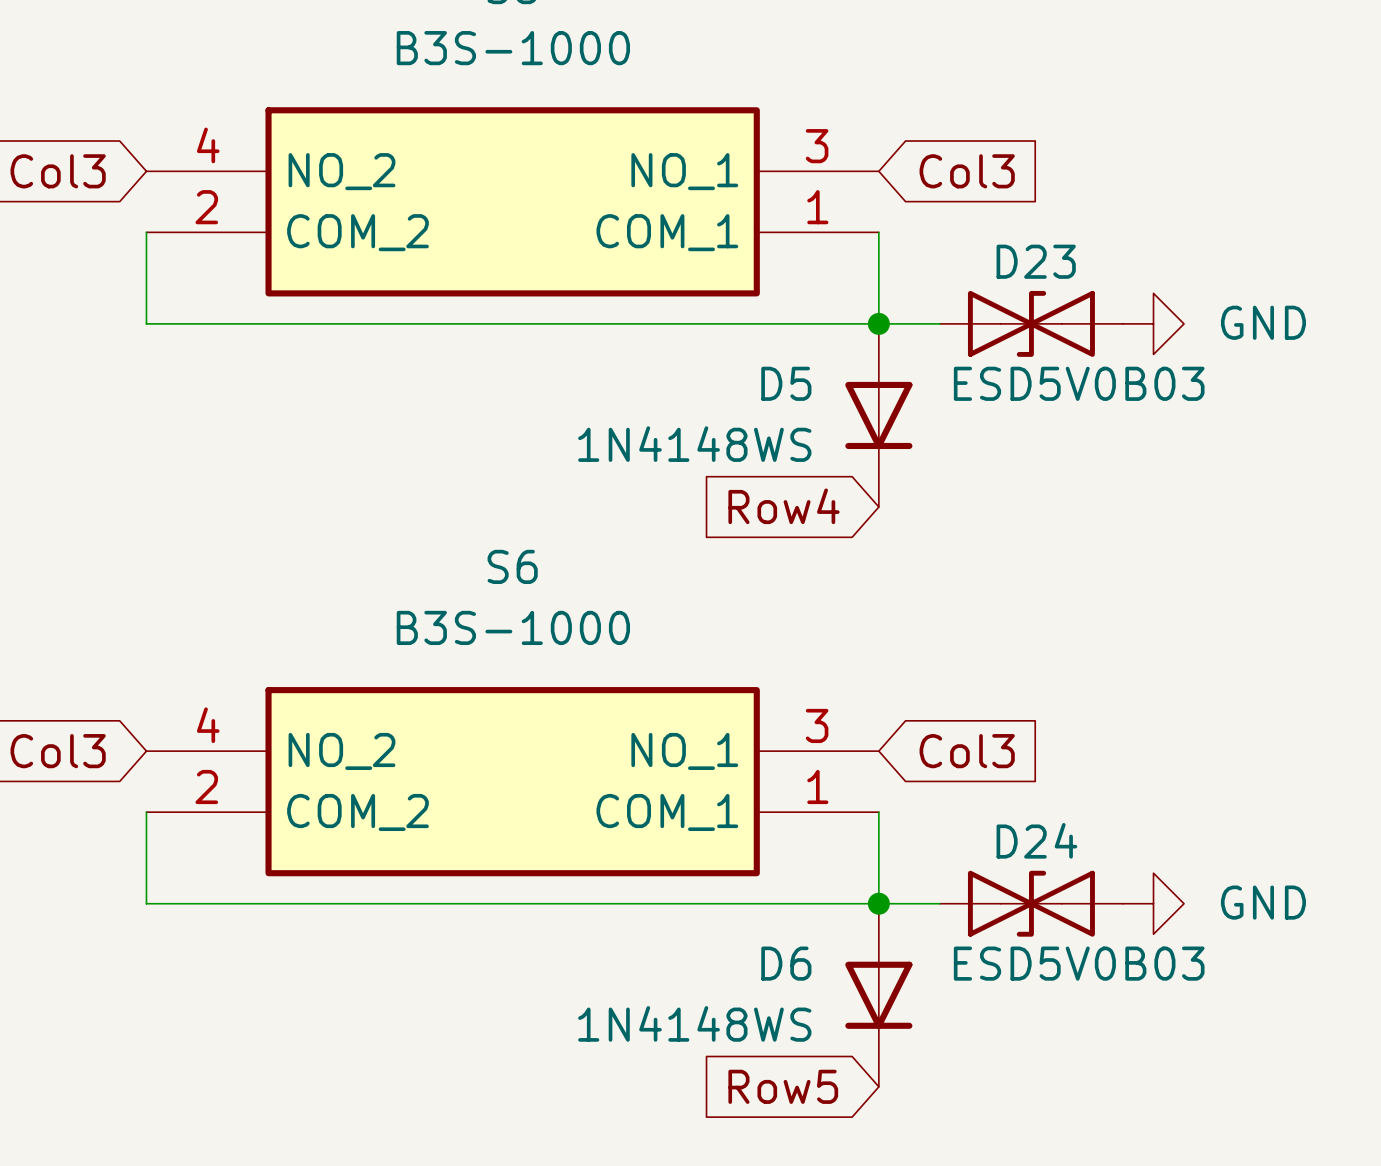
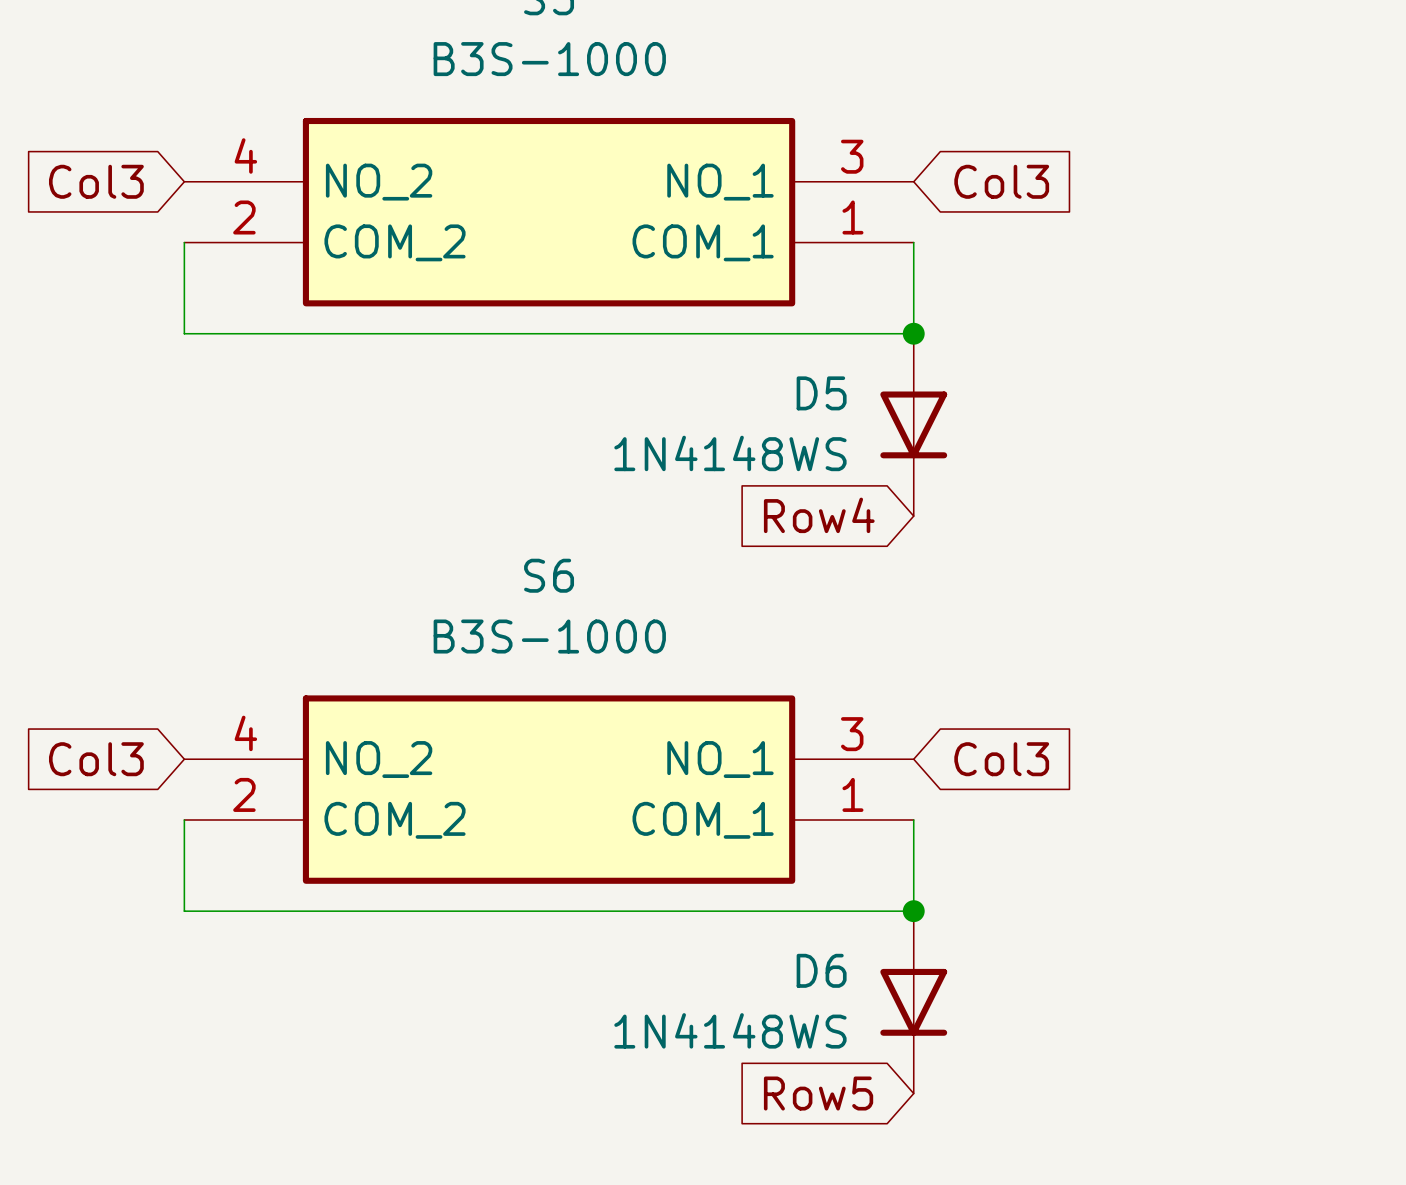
wire: (878, 323) (939, 323) -> none
D23: ESD5V0B03 (1031, 323) -> none
power symbol: GND (1153, 323) -> none
wire: (878, 903) (939, 903) -> none
D24: ESD5V0B03 (1031, 903) -> none
power symbol: GND (1153, 903) -> none

